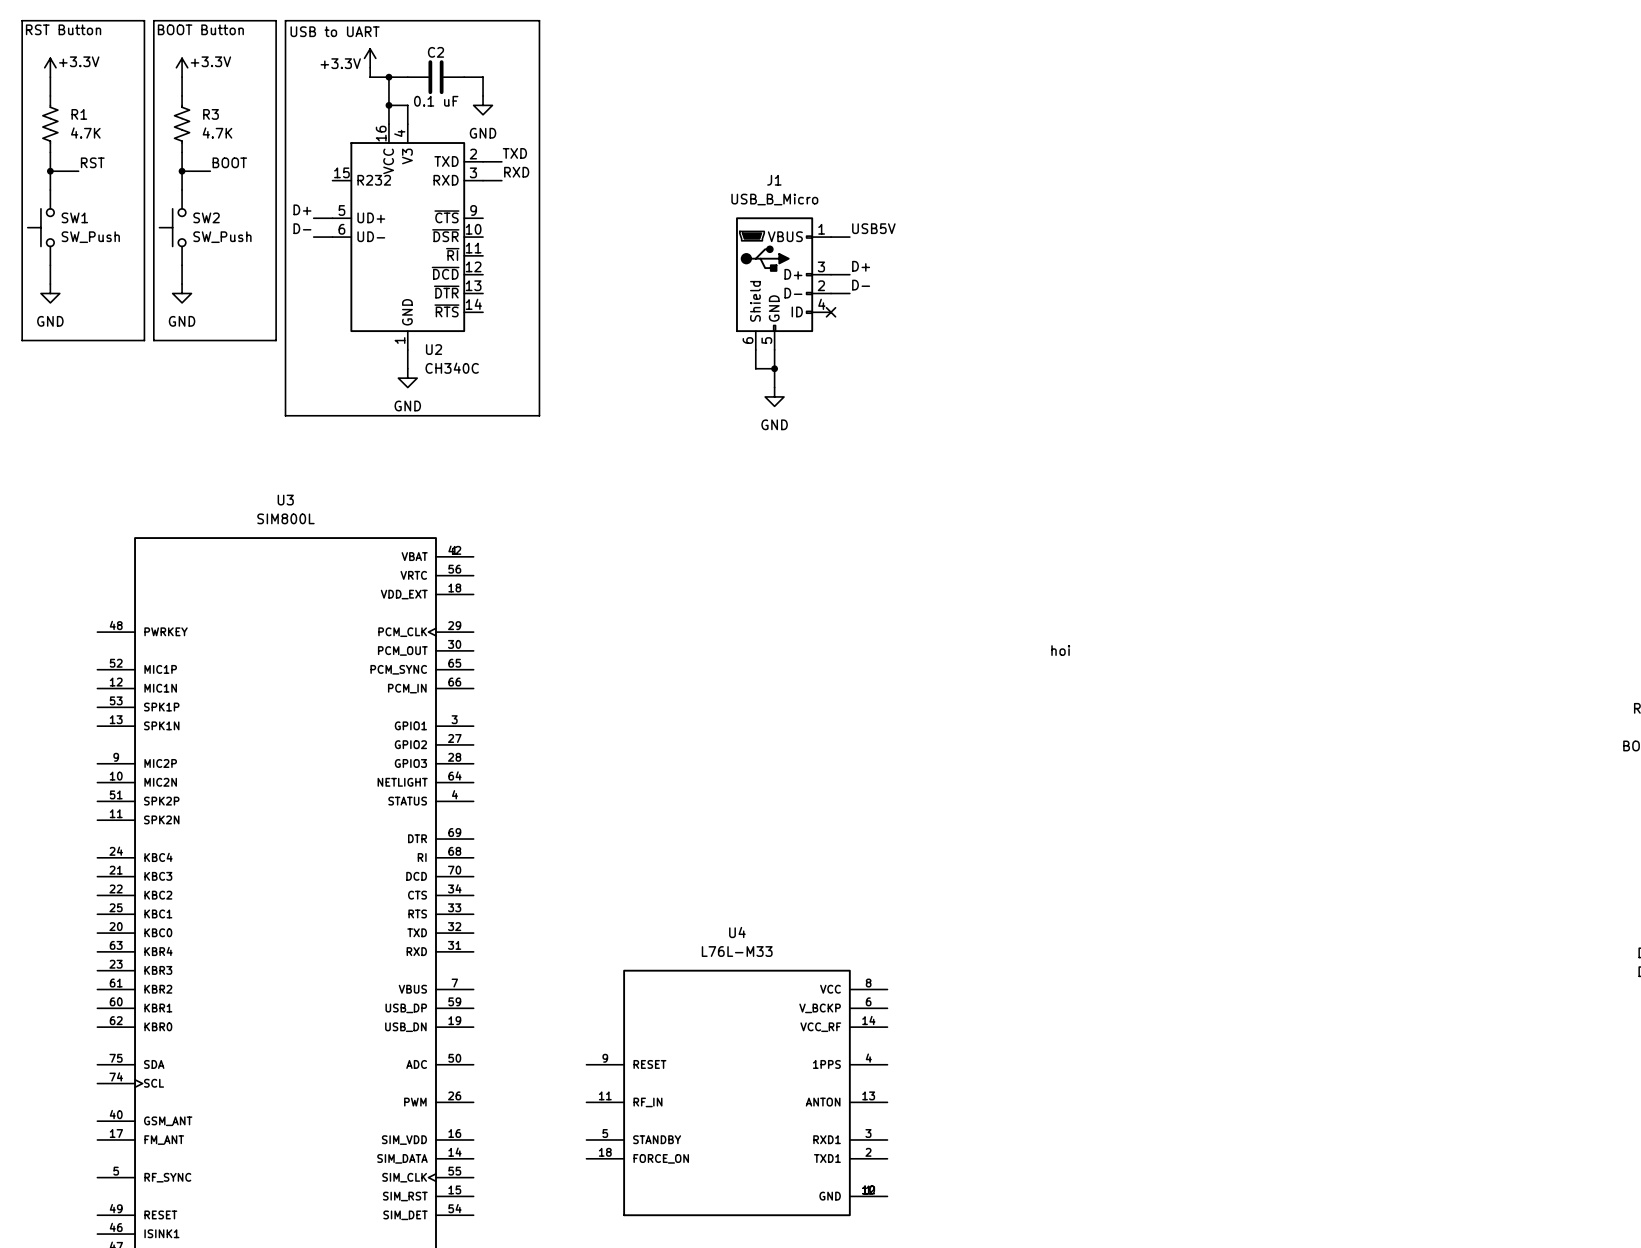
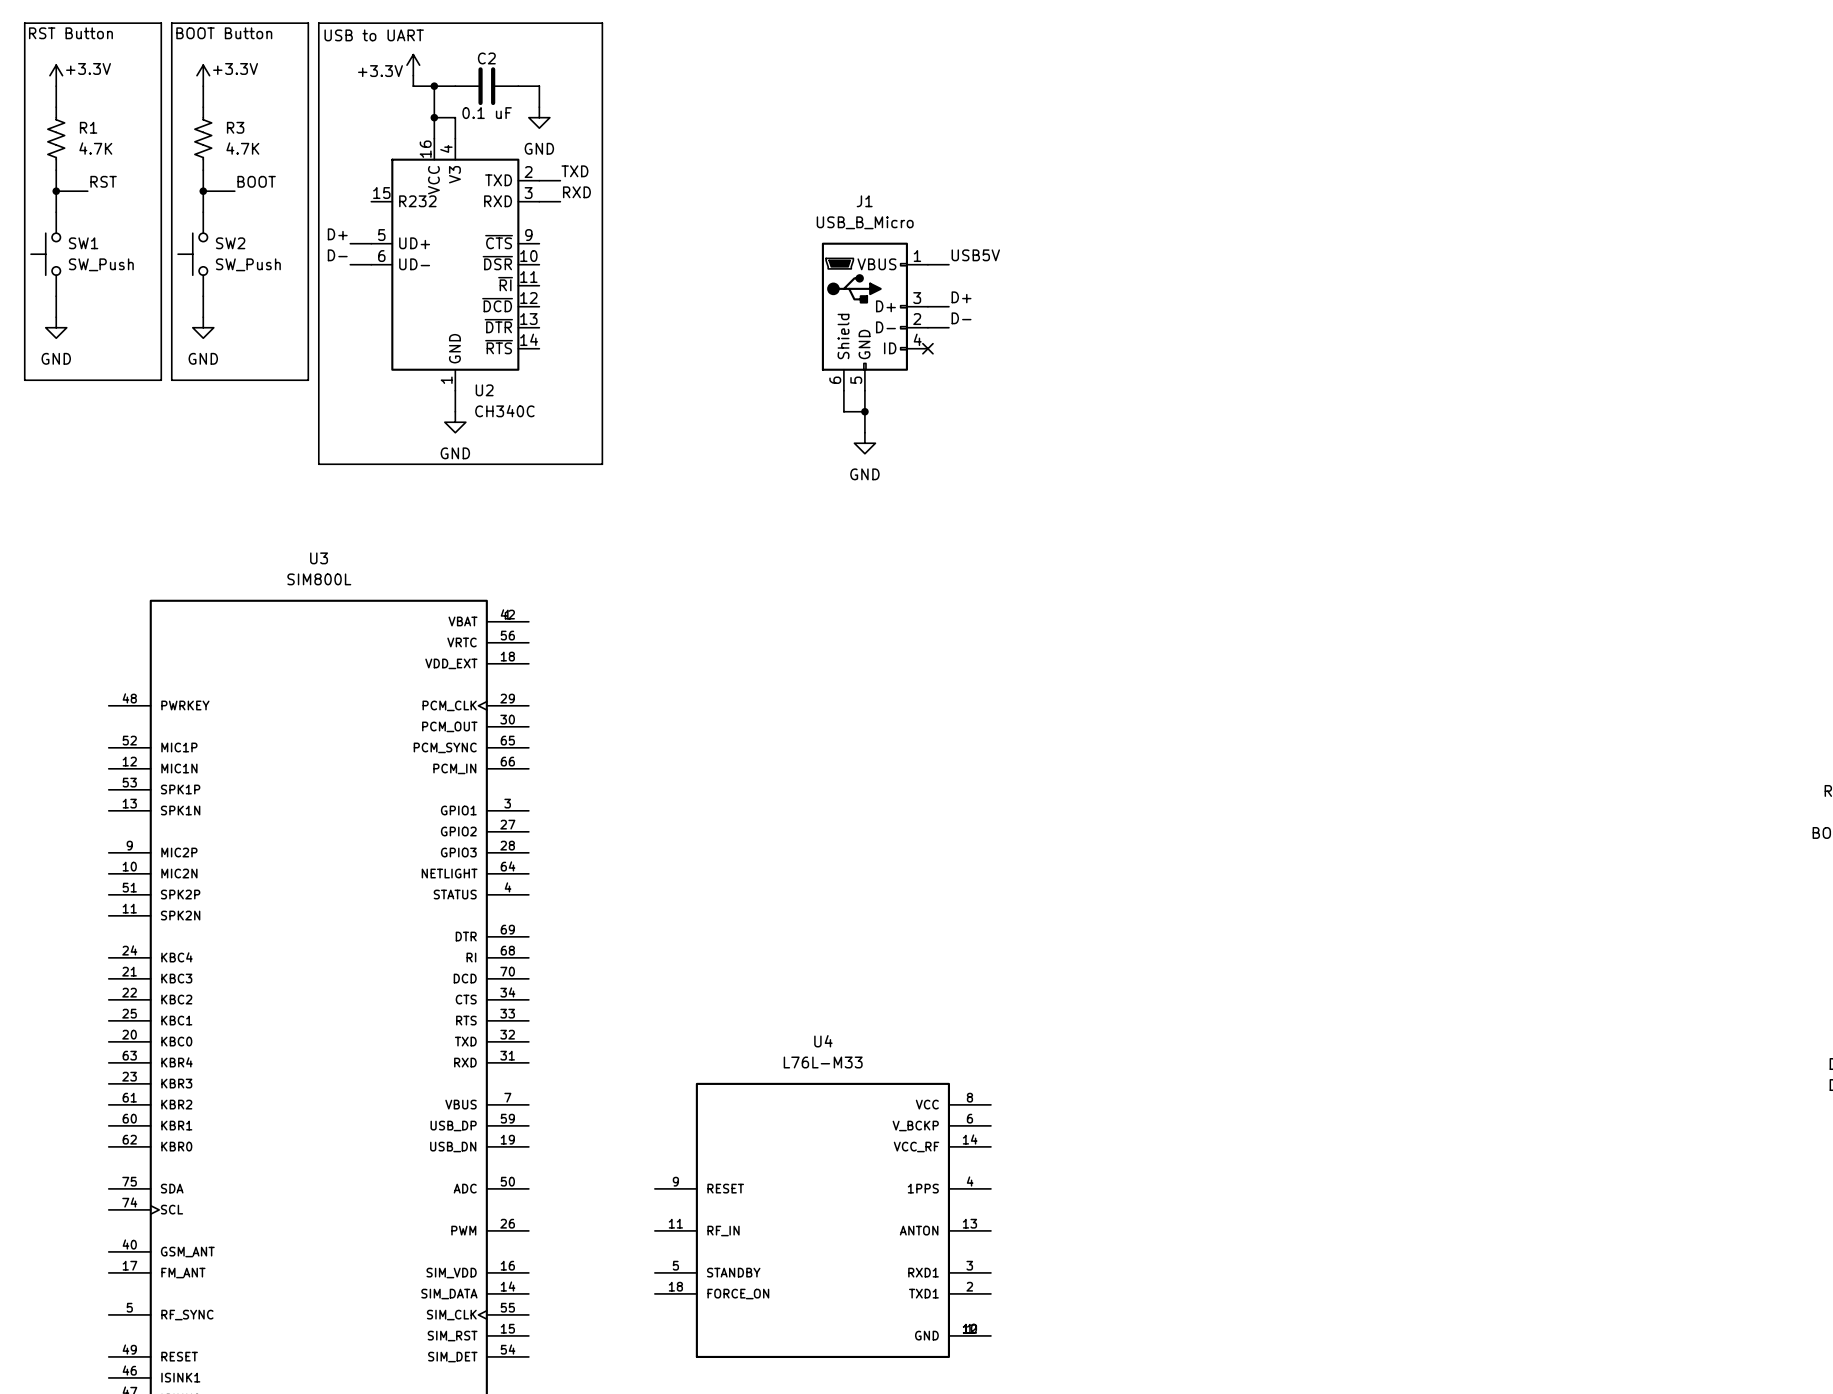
text: hoi (1060, 650) -> none

